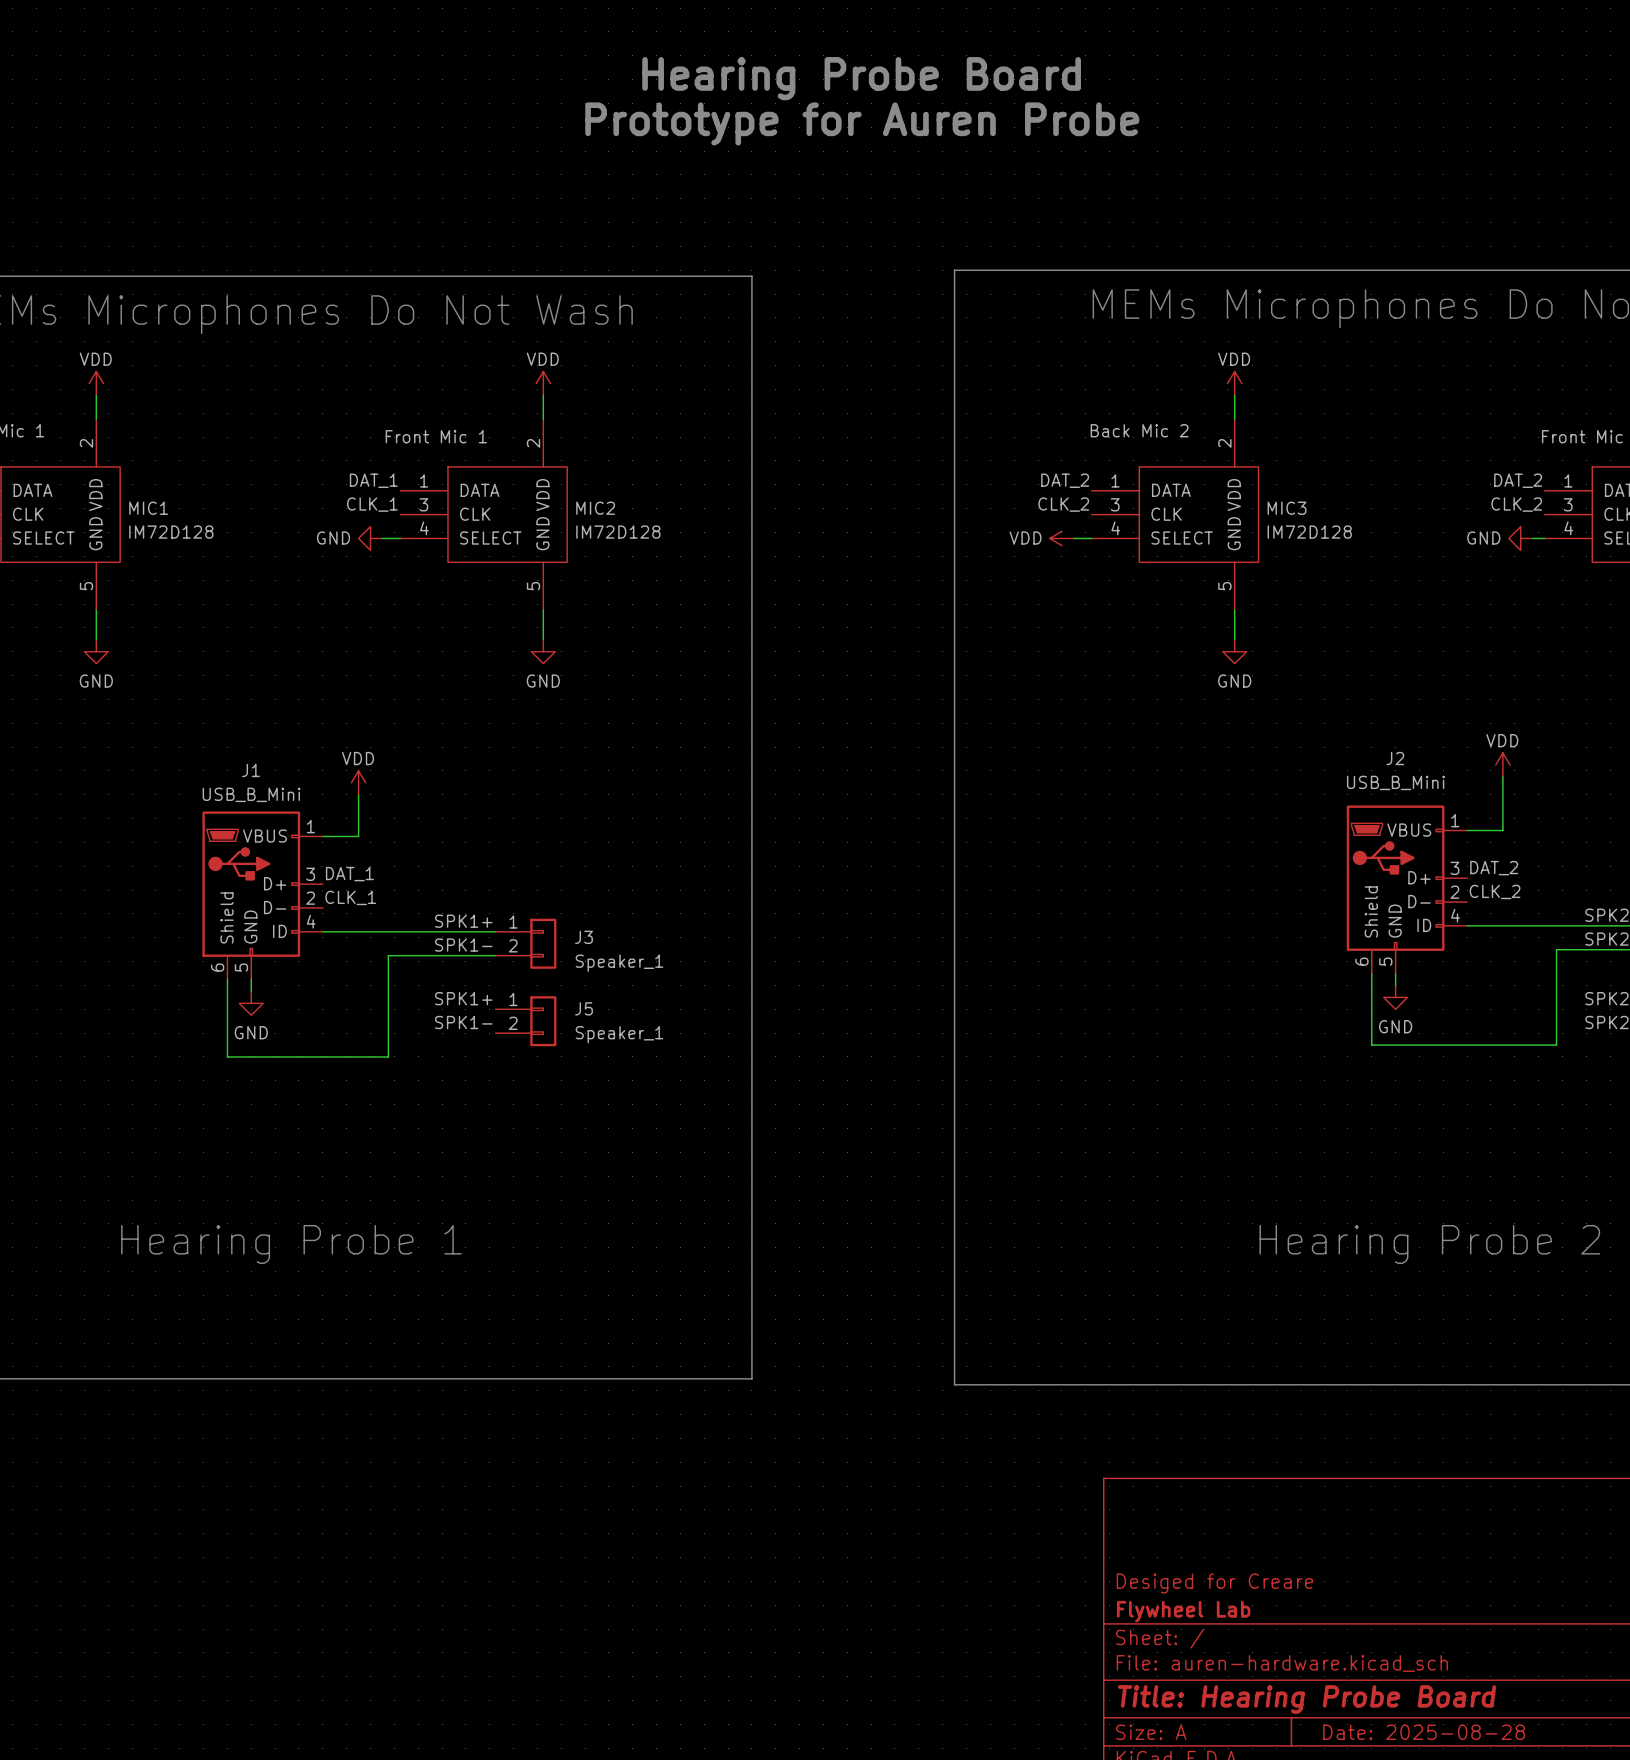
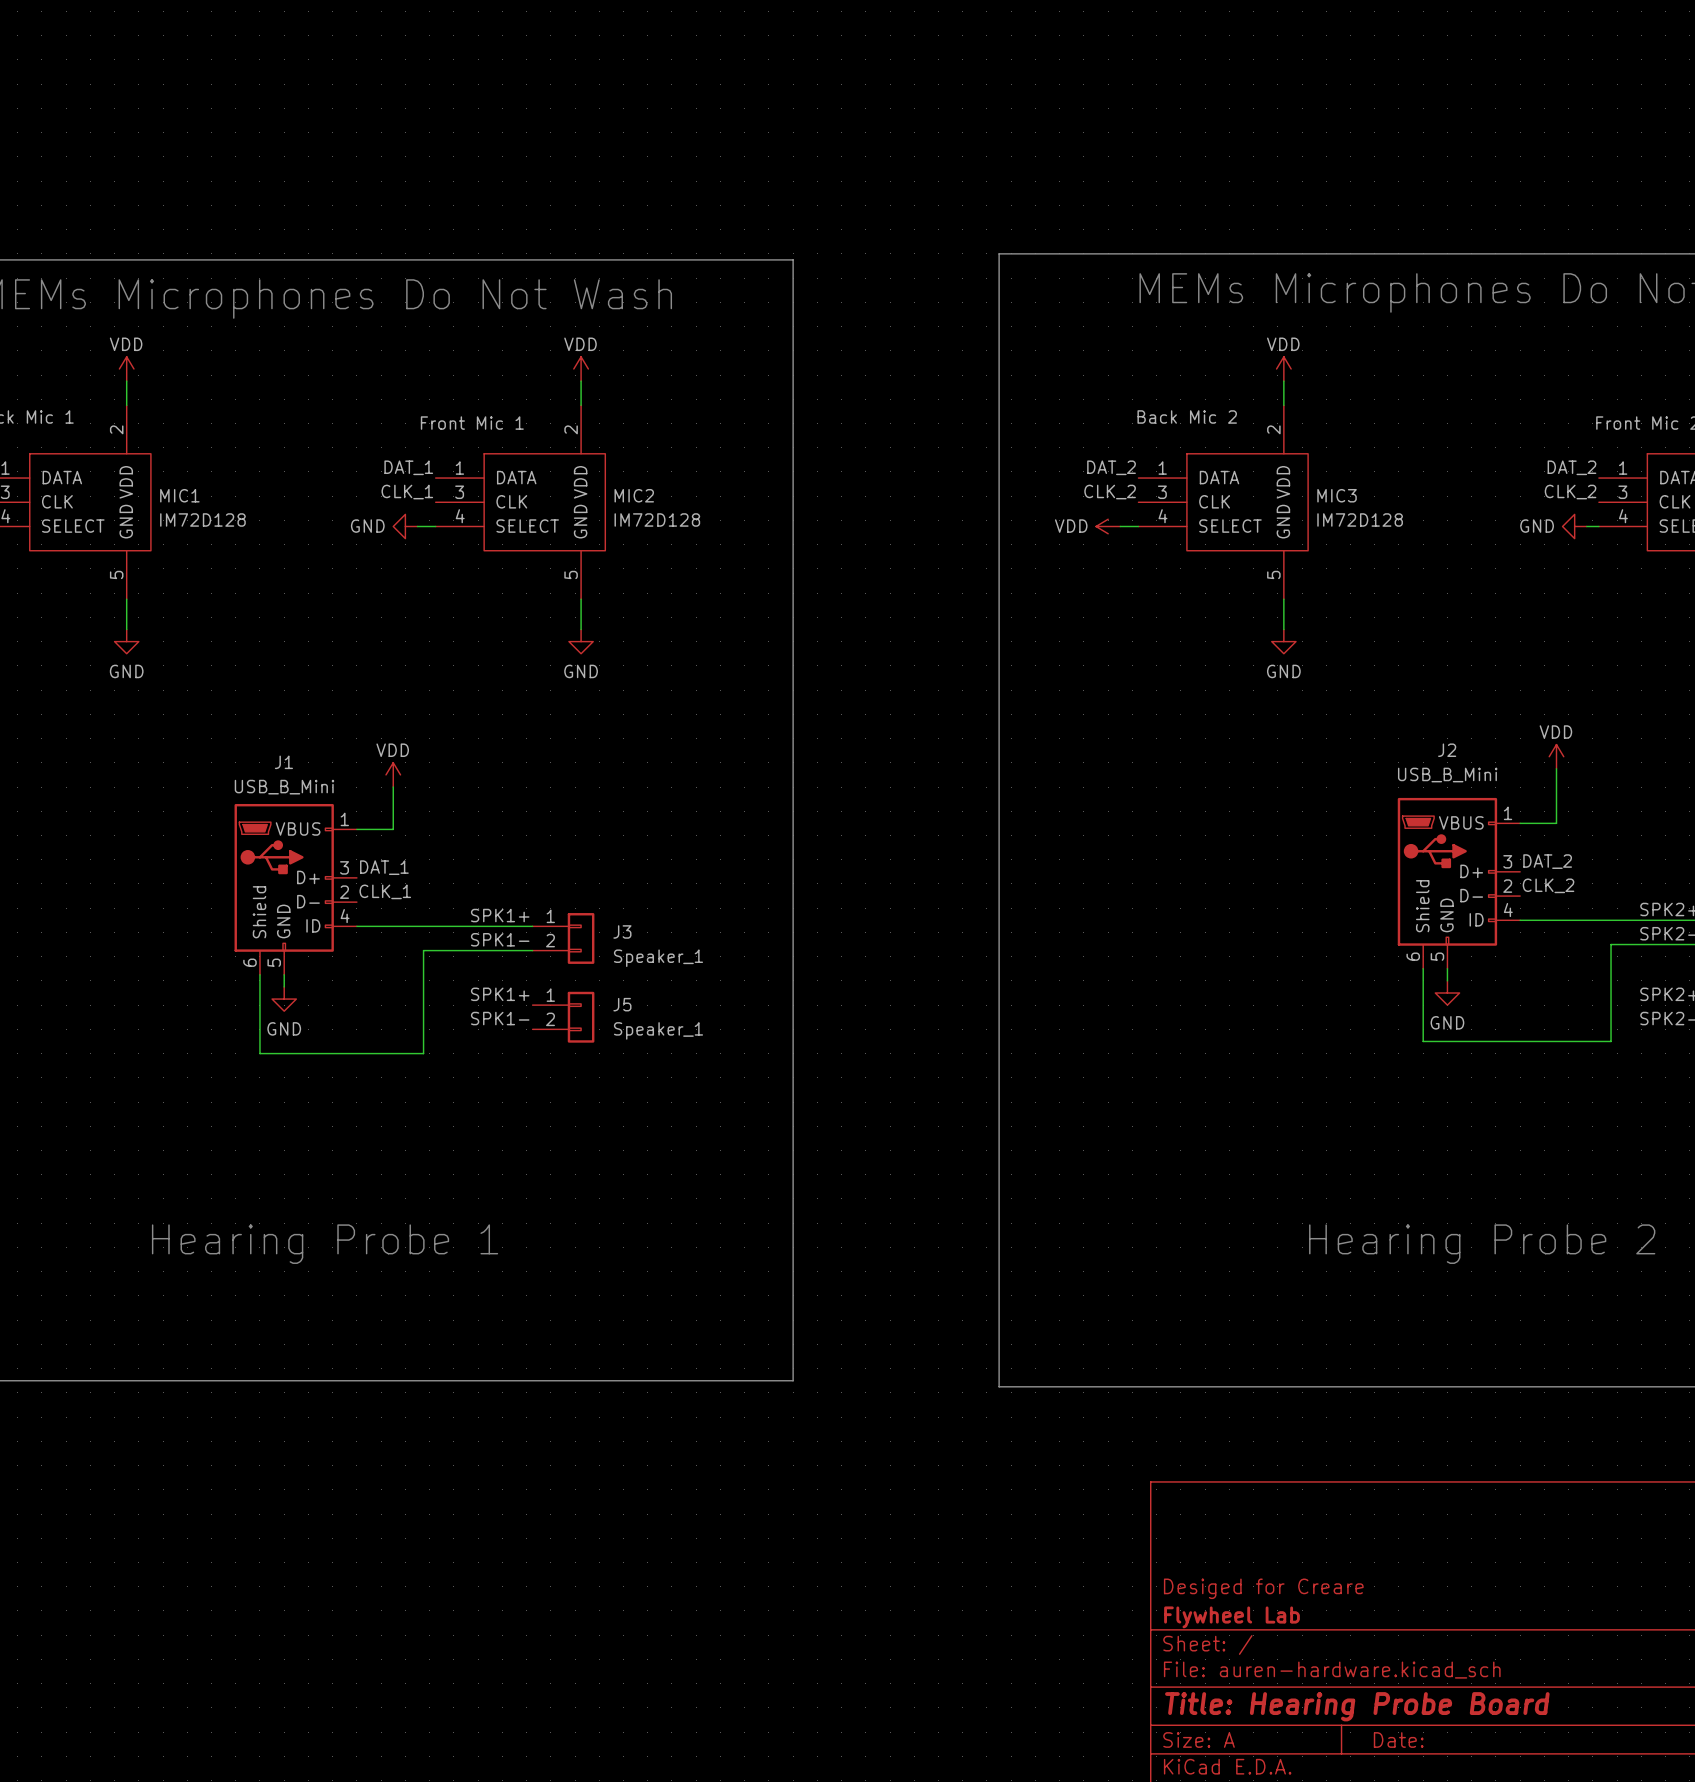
text: Hearing Probe Board (861, 78) -> none
text: Prototype for Auren Probe (862, 123) -> none
title block: Date: 2025-08-28 (1424, 1732) -> Date: (1398, 1740)

